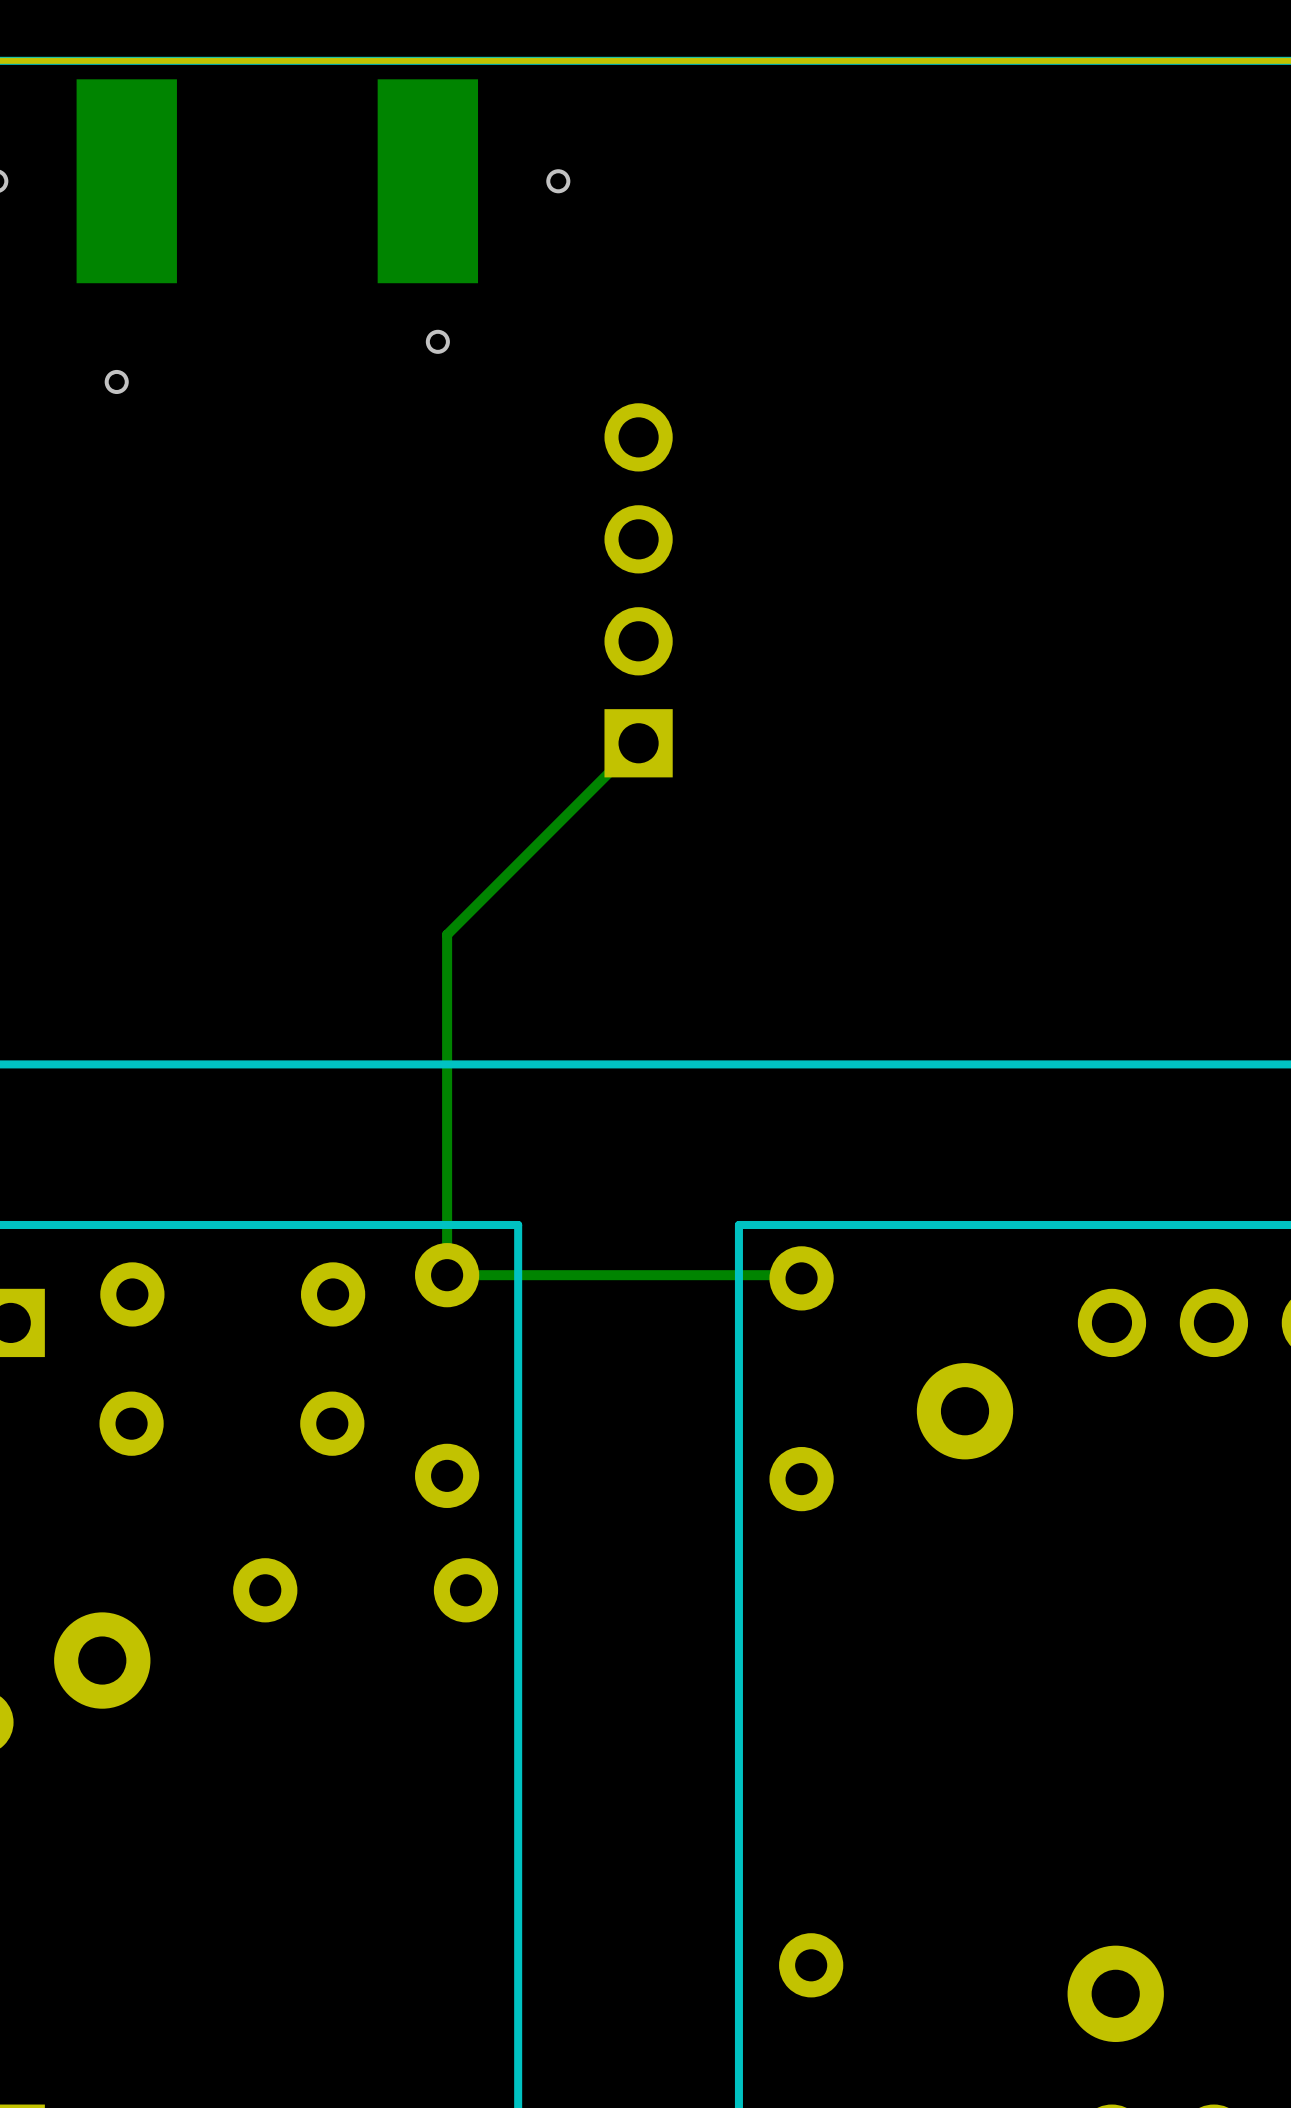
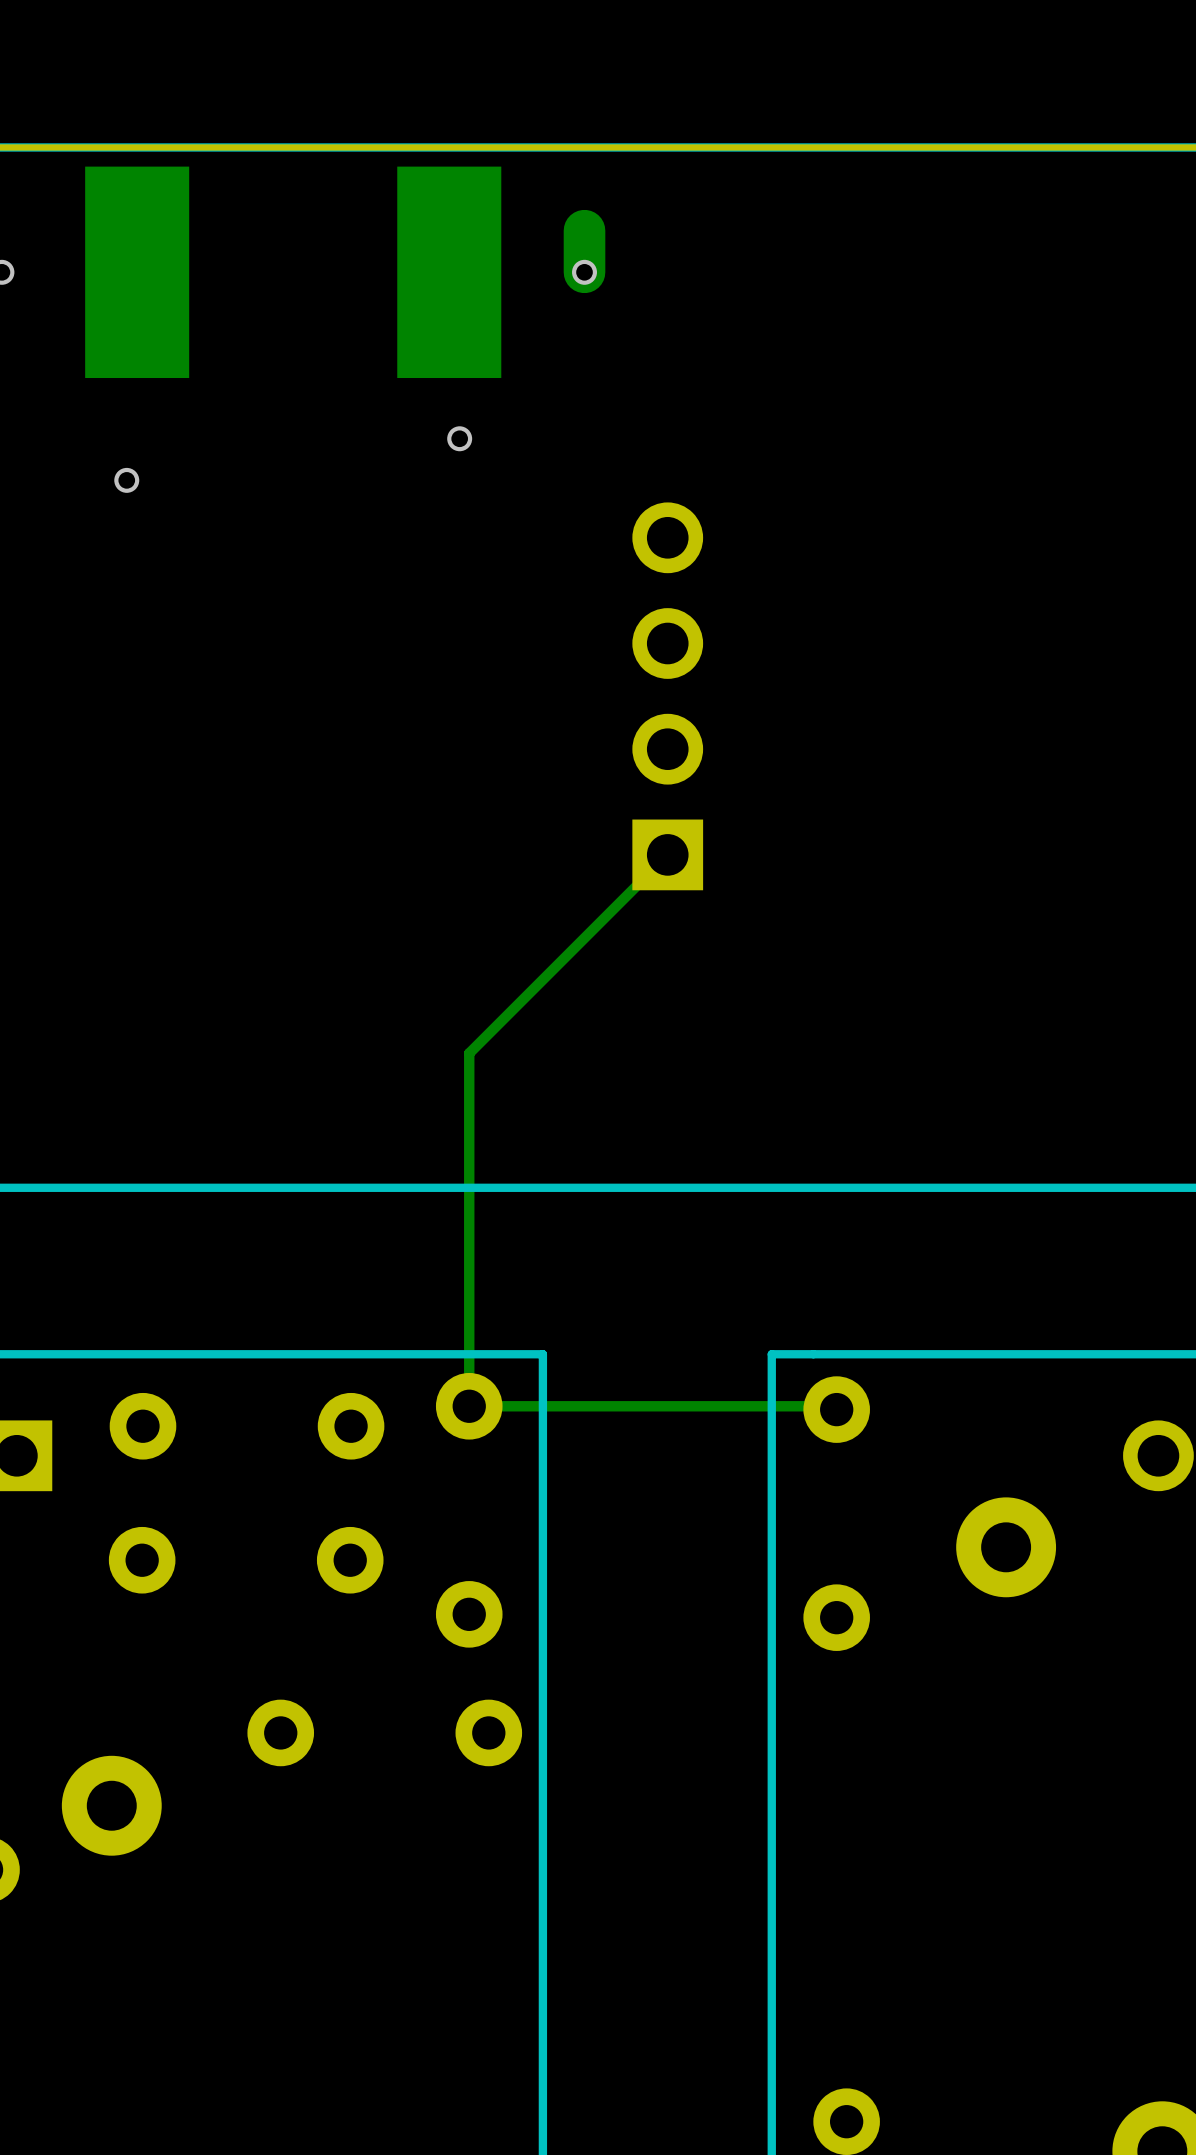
track: none -> (584, 230) (584, 272)

